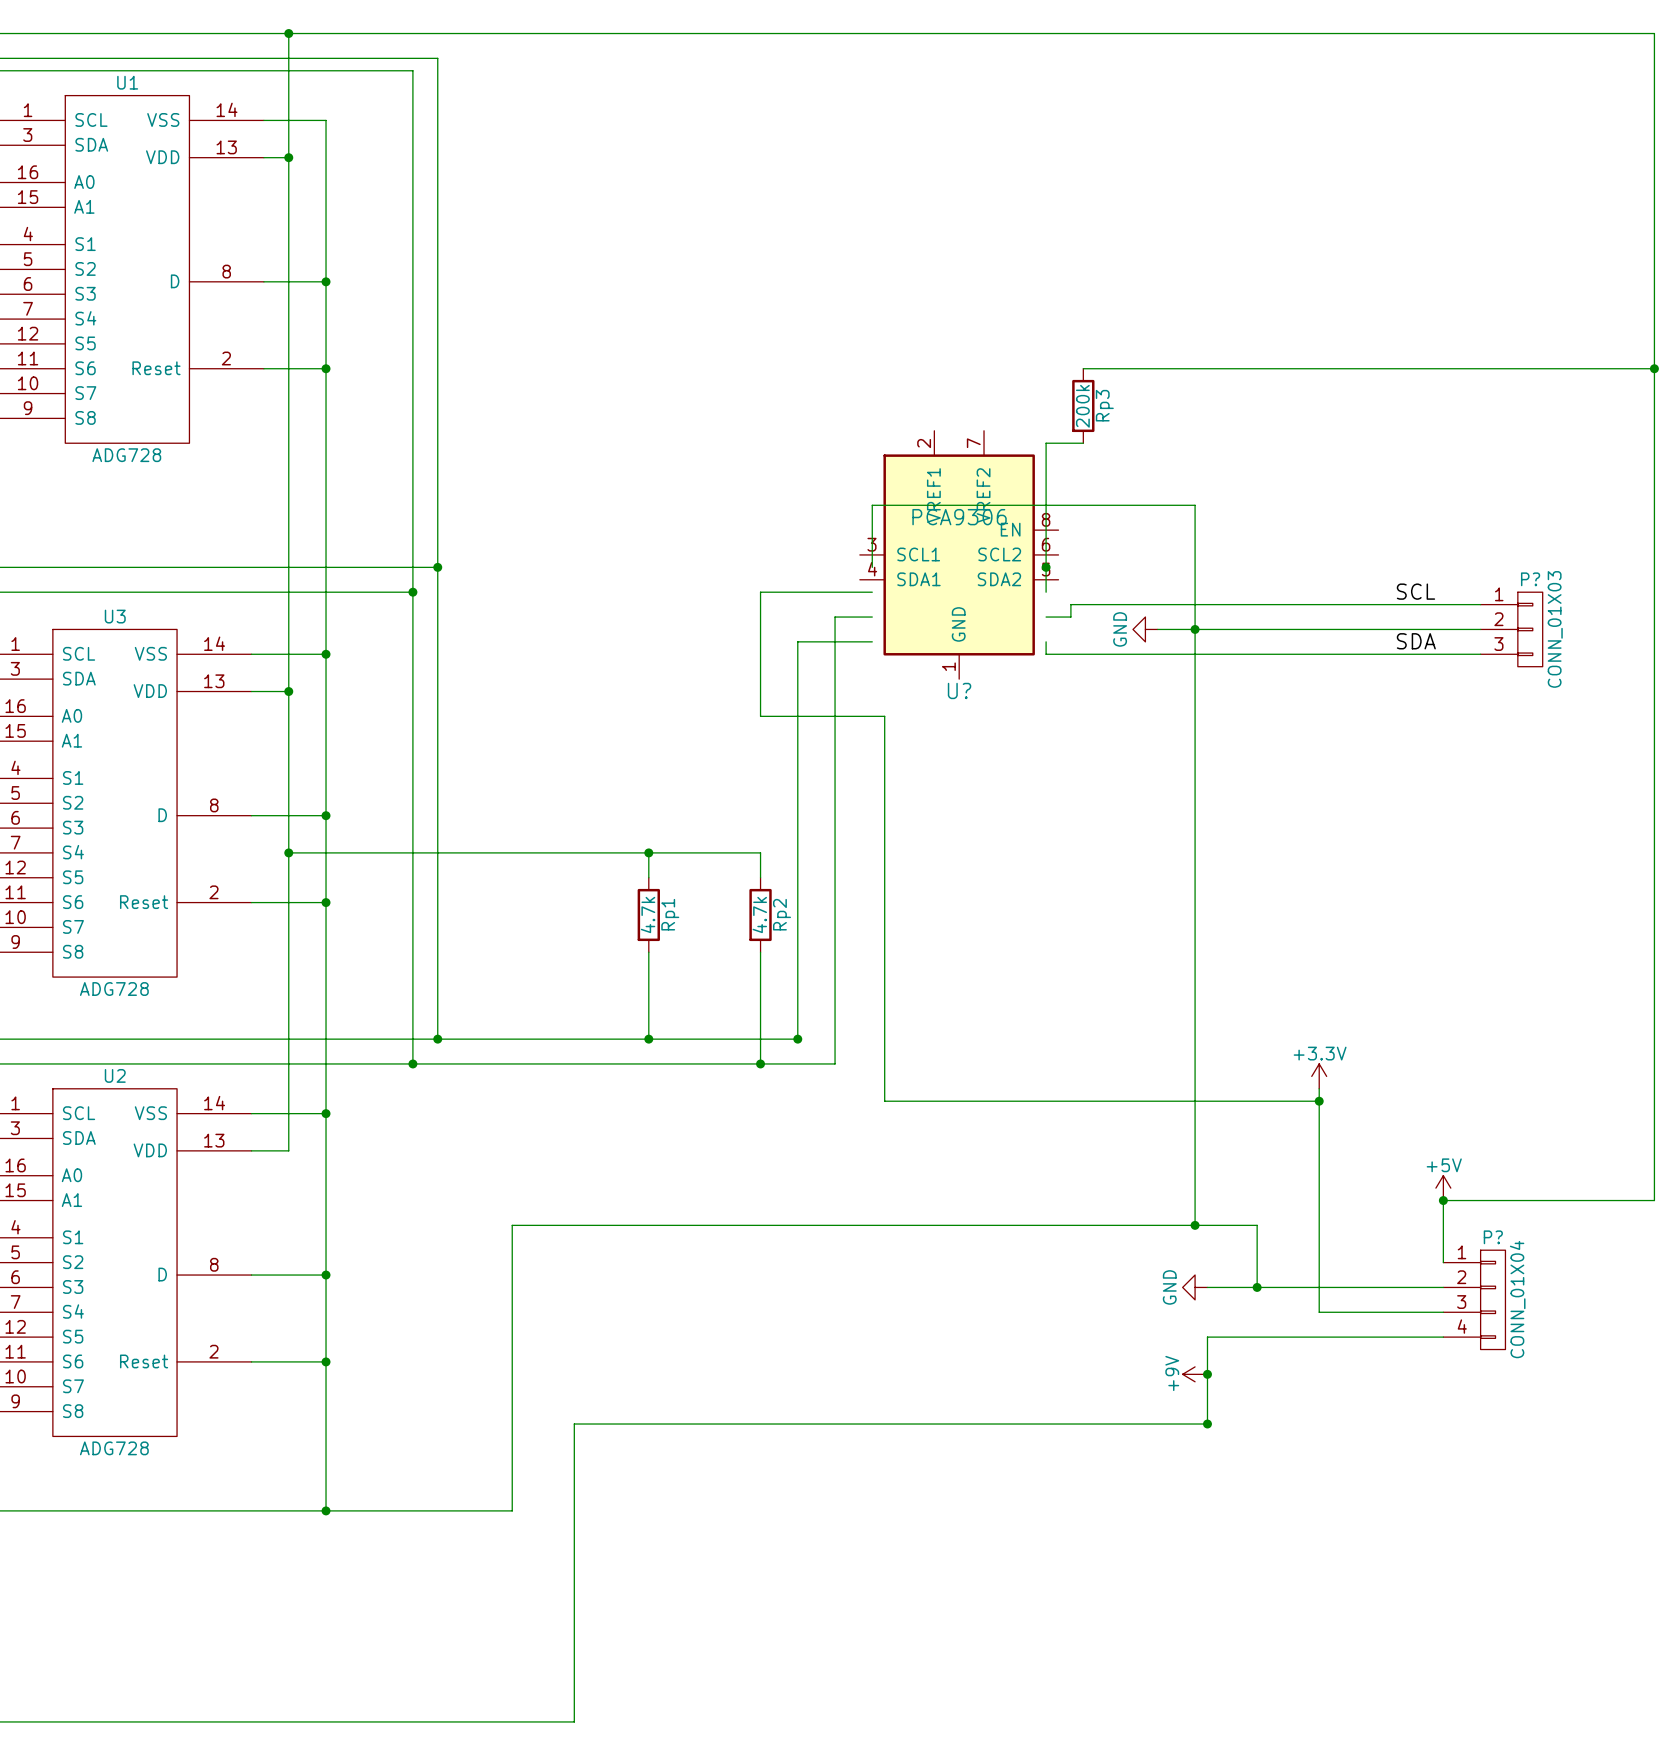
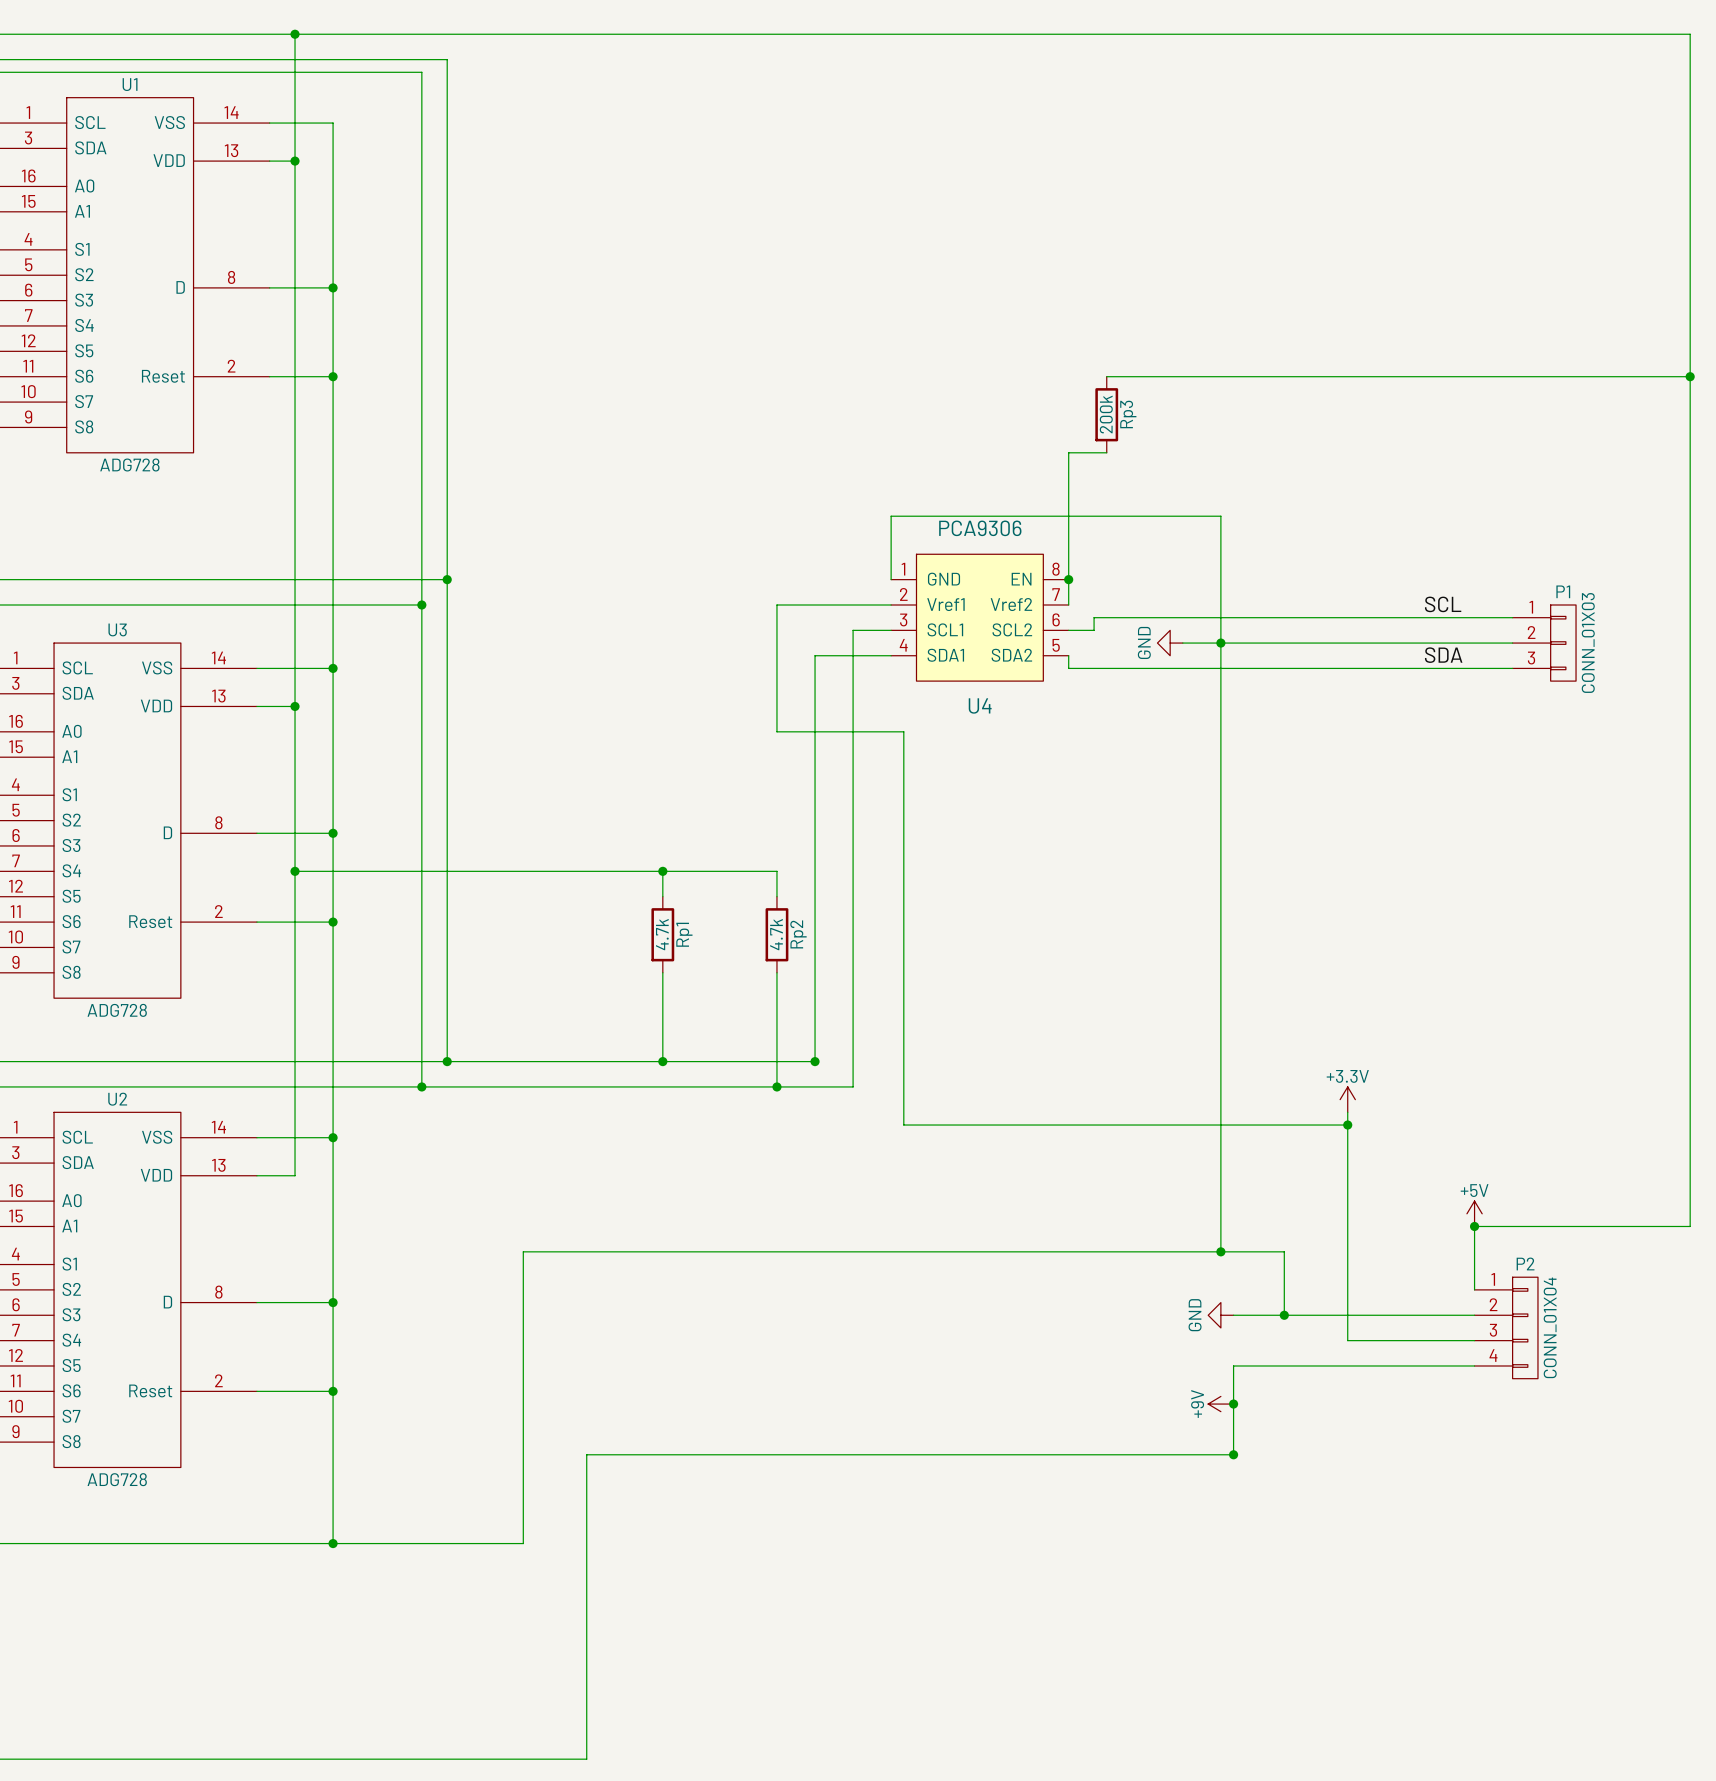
U?: PCA9306 (959, 554) -> none
P? name: P? (1530, 579) -> P1 (1563, 591)
U4: none -> PCA9306 (979, 617)
P? name: P? (1493, 1237) -> P2 (1525, 1263)

